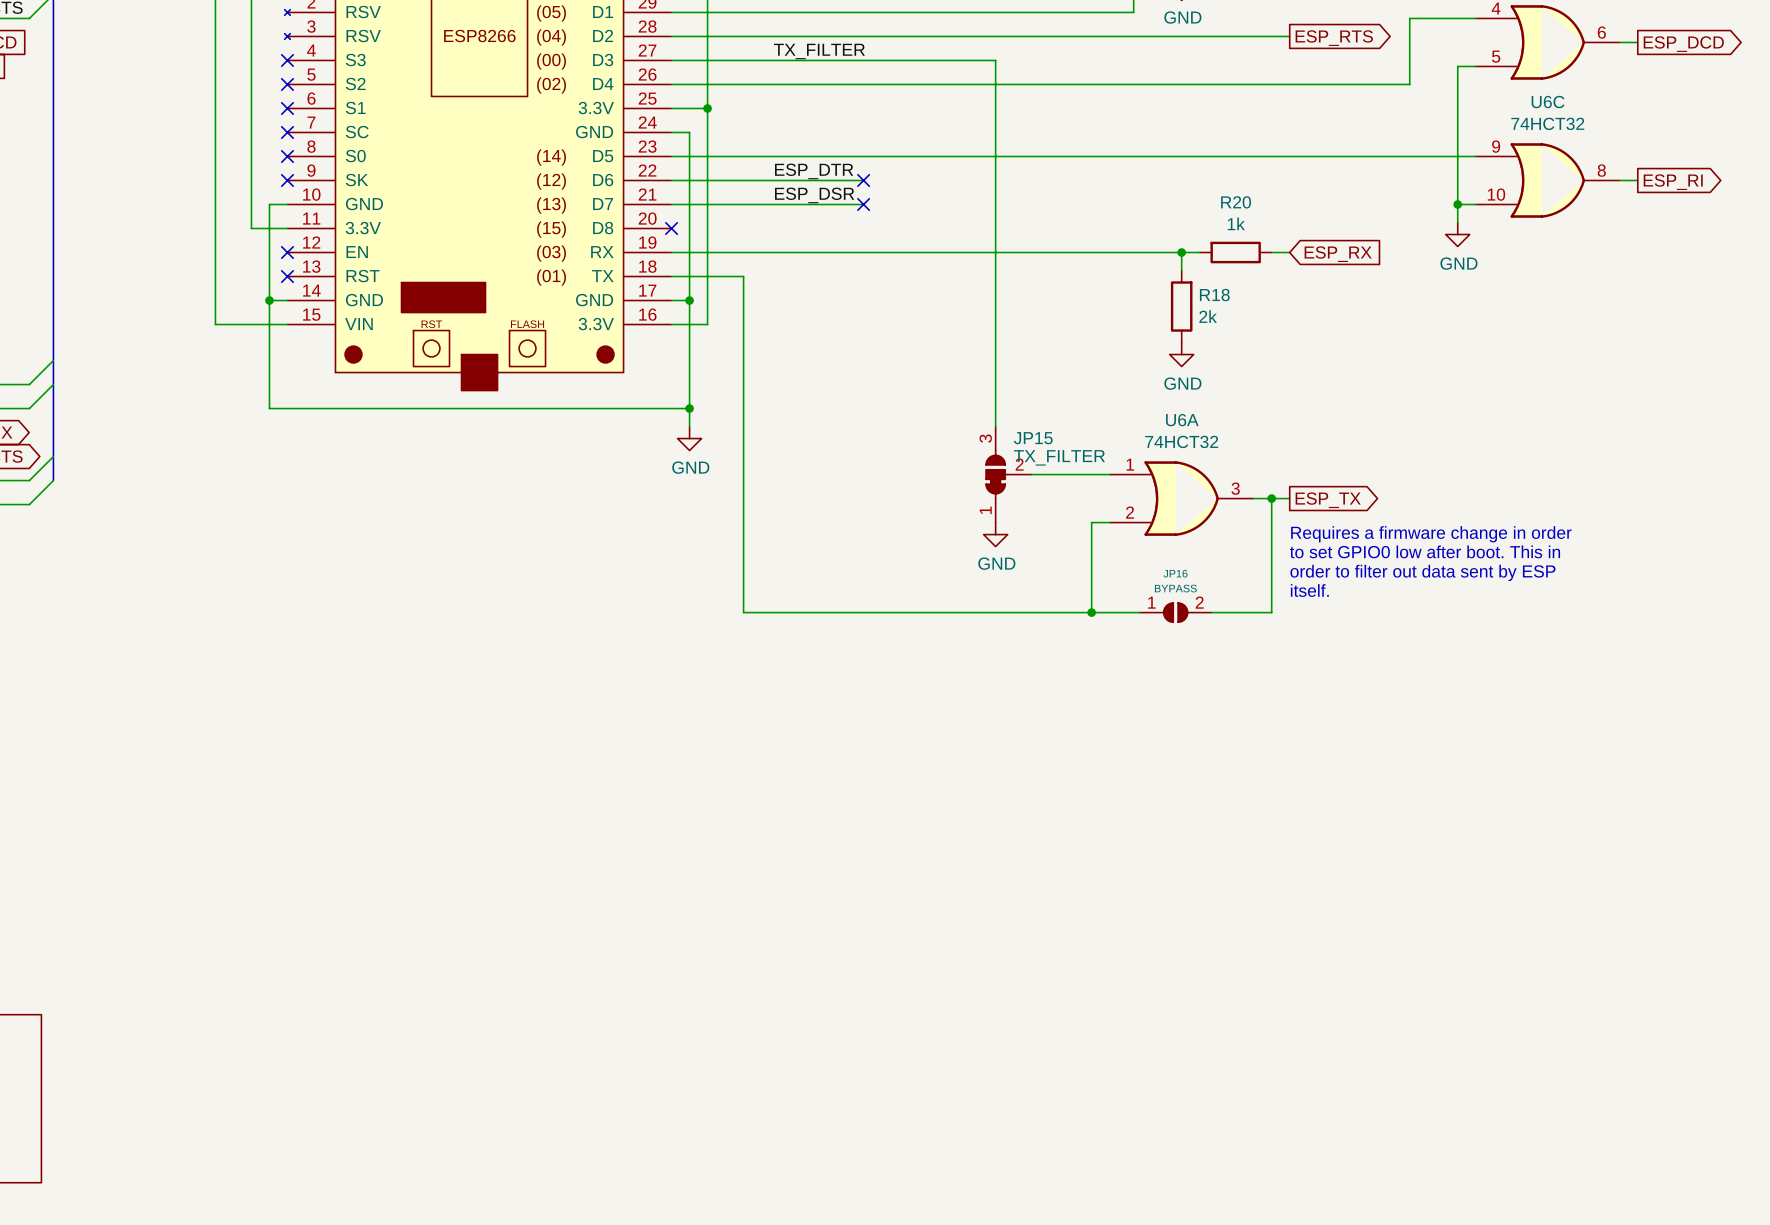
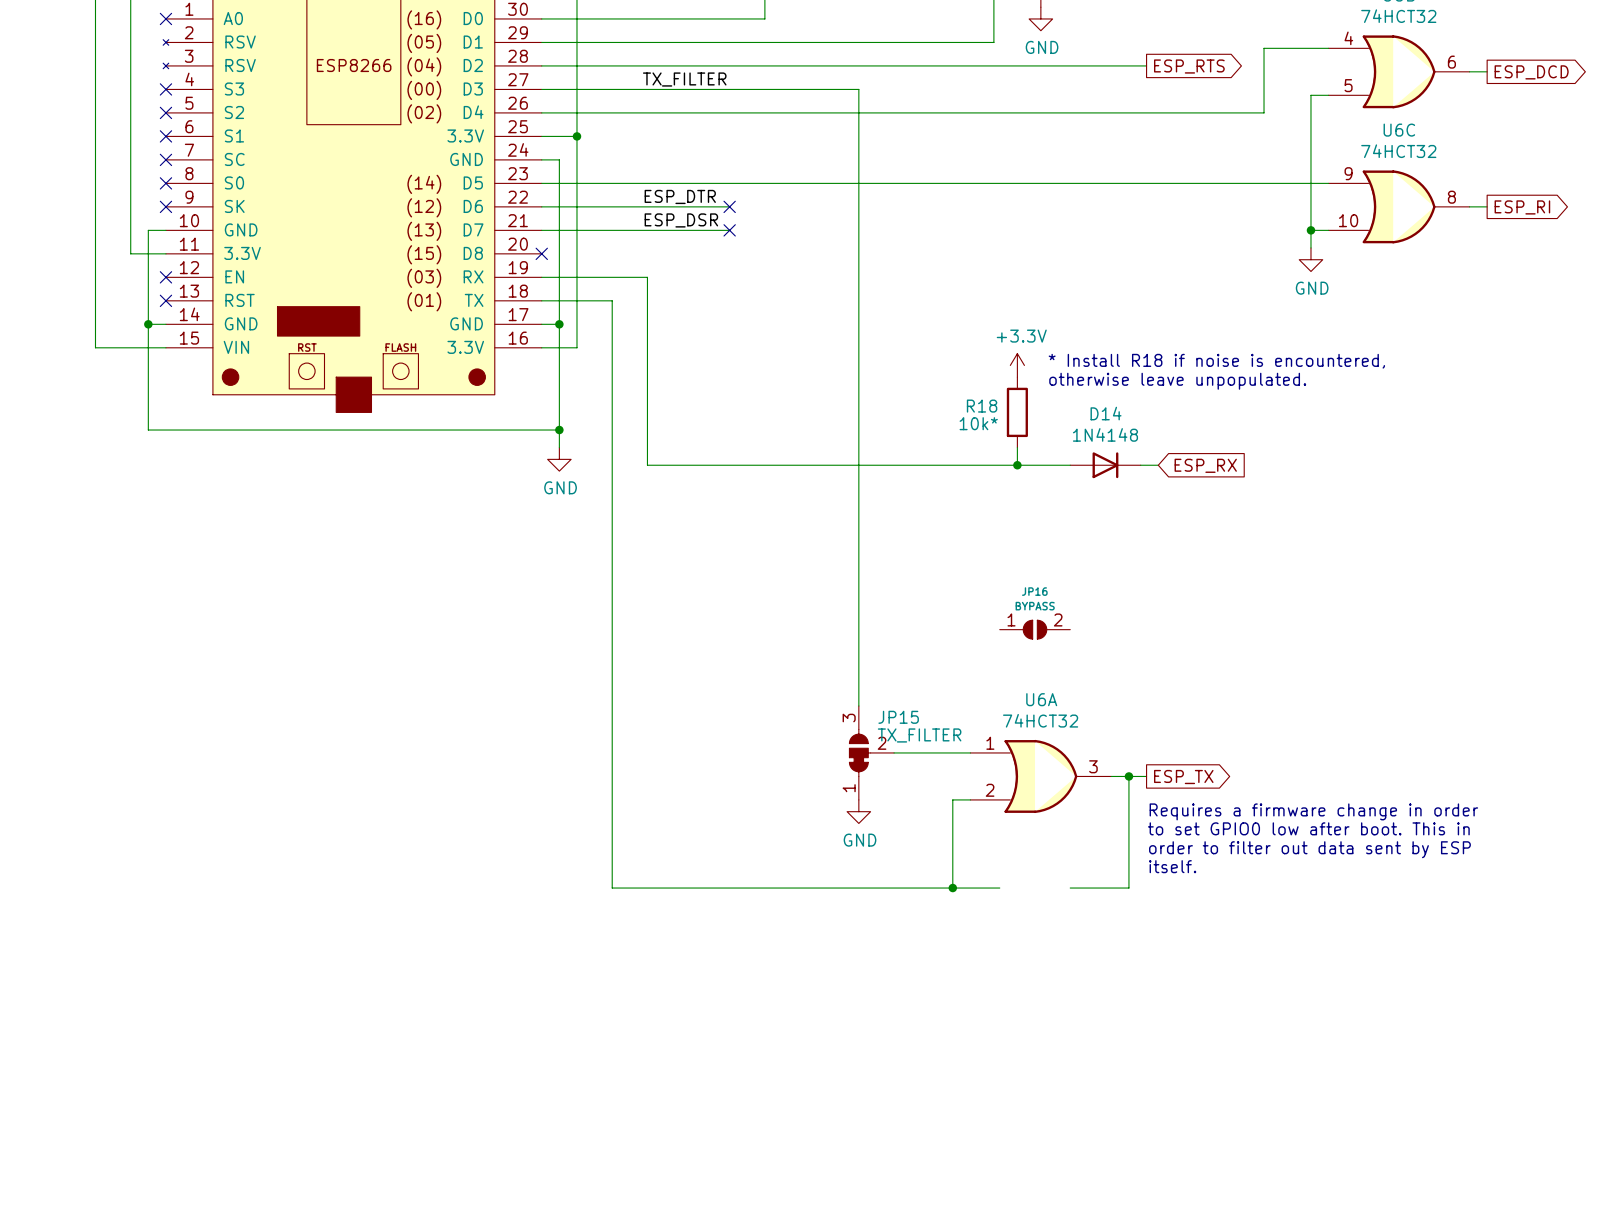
wire: (779, 252) (1199, 252) -> (647, 277) (647, 465) (1070, 465)
wire: (1181, 252) (1181, 270) -> (1017, 447) (1017, 465)
junction: (1181, 252) -> none
R20: 1k (1235, 252) -> none
wire: (1271, 252) (1289, 252) -> (1140, 465) (1158, 465)
global label position: ESP_RX (1338, 254) -> ESP_RX (1205, 465)
R18 name position: R18 (1214, 295) -> R18 (982, 406)
R18 position: (1181, 306) -> (1017, 412)
R18 value: 2k (1208, 316) -> 10k* (978, 423)
text: none -> * Install R18 if noise is encountered, (1216, 361)
power symbol: none -> +3.3V (1017, 365)
power symbol: GND (1181, 354) -> none
text: none -> otherwise leave unpopulated. (1177, 381)
wire: none -> (858, 447) (858, 705)
junction: none -> (1017, 465)
D14: none -> 1N4148 (1105, 465)
JP15 position: (1008, 474) -> (871, 752)
wire: (1031, 474) (1109, 474) -> none
U6A position: (1181, 498) -> (1040, 776)
wire: (1253, 498) (1289, 498) -> none
wire: (1271, 498) (1271, 612) (1211, 612) -> none
junction: (1271, 498) -> none
global label: ESP_TX (1328, 500) -> none
wire: (1109, 522) (1091, 522) (1091, 612) -> none
power symbol: GND (995, 534) -> none
text: Requires a firmware change in order (1431, 534) -> none
text: to set GPIO0 low after boot. This in (1425, 551) -> none
text: order to filter out data sent by ESP (1422, 572) -> none
text: itself. (1309, 590) -> none
wire: (743, 612) (1139, 612) -> (612, 629) (612, 888) (999, 888)
junction: (1091, 612) -> none
wire: none -> (894, 752) (970, 752)
wire: none -> (1111, 776) (1146, 776)
wire: none -> (1128, 776) (1128, 888) (1070, 888)
junction: none -> (1128, 776)
global label: none -> ESP_TX (1183, 777)
wire: none -> (970, 799) (952, 799) (952, 888)
power symbol: none -> GND (858, 811)
text: none -> Requires a firmware change in order (1313, 811)
text: none -> to set GPIO0 low after boot. This in (1308, 828)
text: none -> order to filter out data sent by ESP (1309, 849)
text: none -> itself. (1172, 866)
junction: none -> (952, 888)

